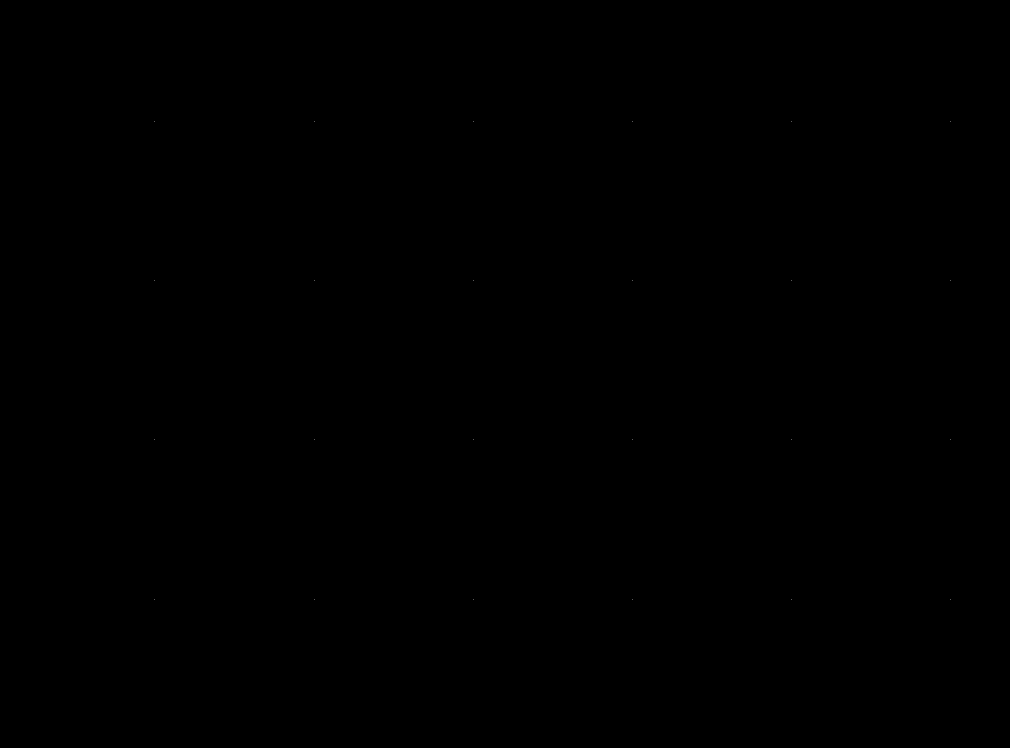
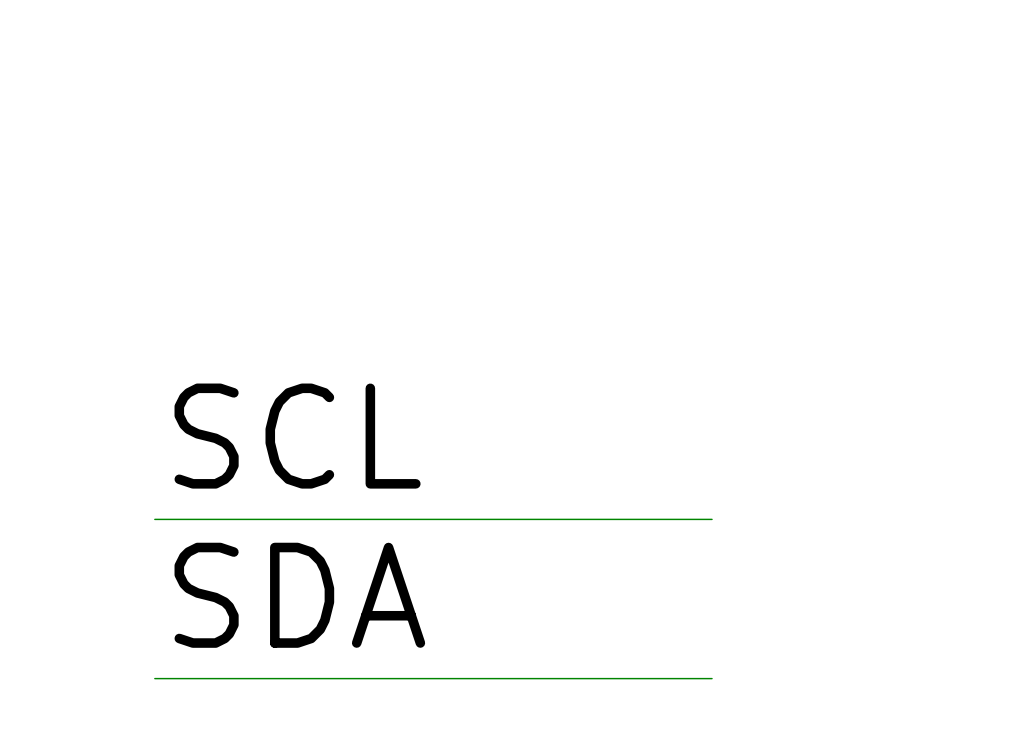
label: none -> SCL (297, 436)
wire: none -> (154, 519) (712, 519)
label: none -> SDA (299, 595)
wire: none -> (154, 678) (712, 678)

